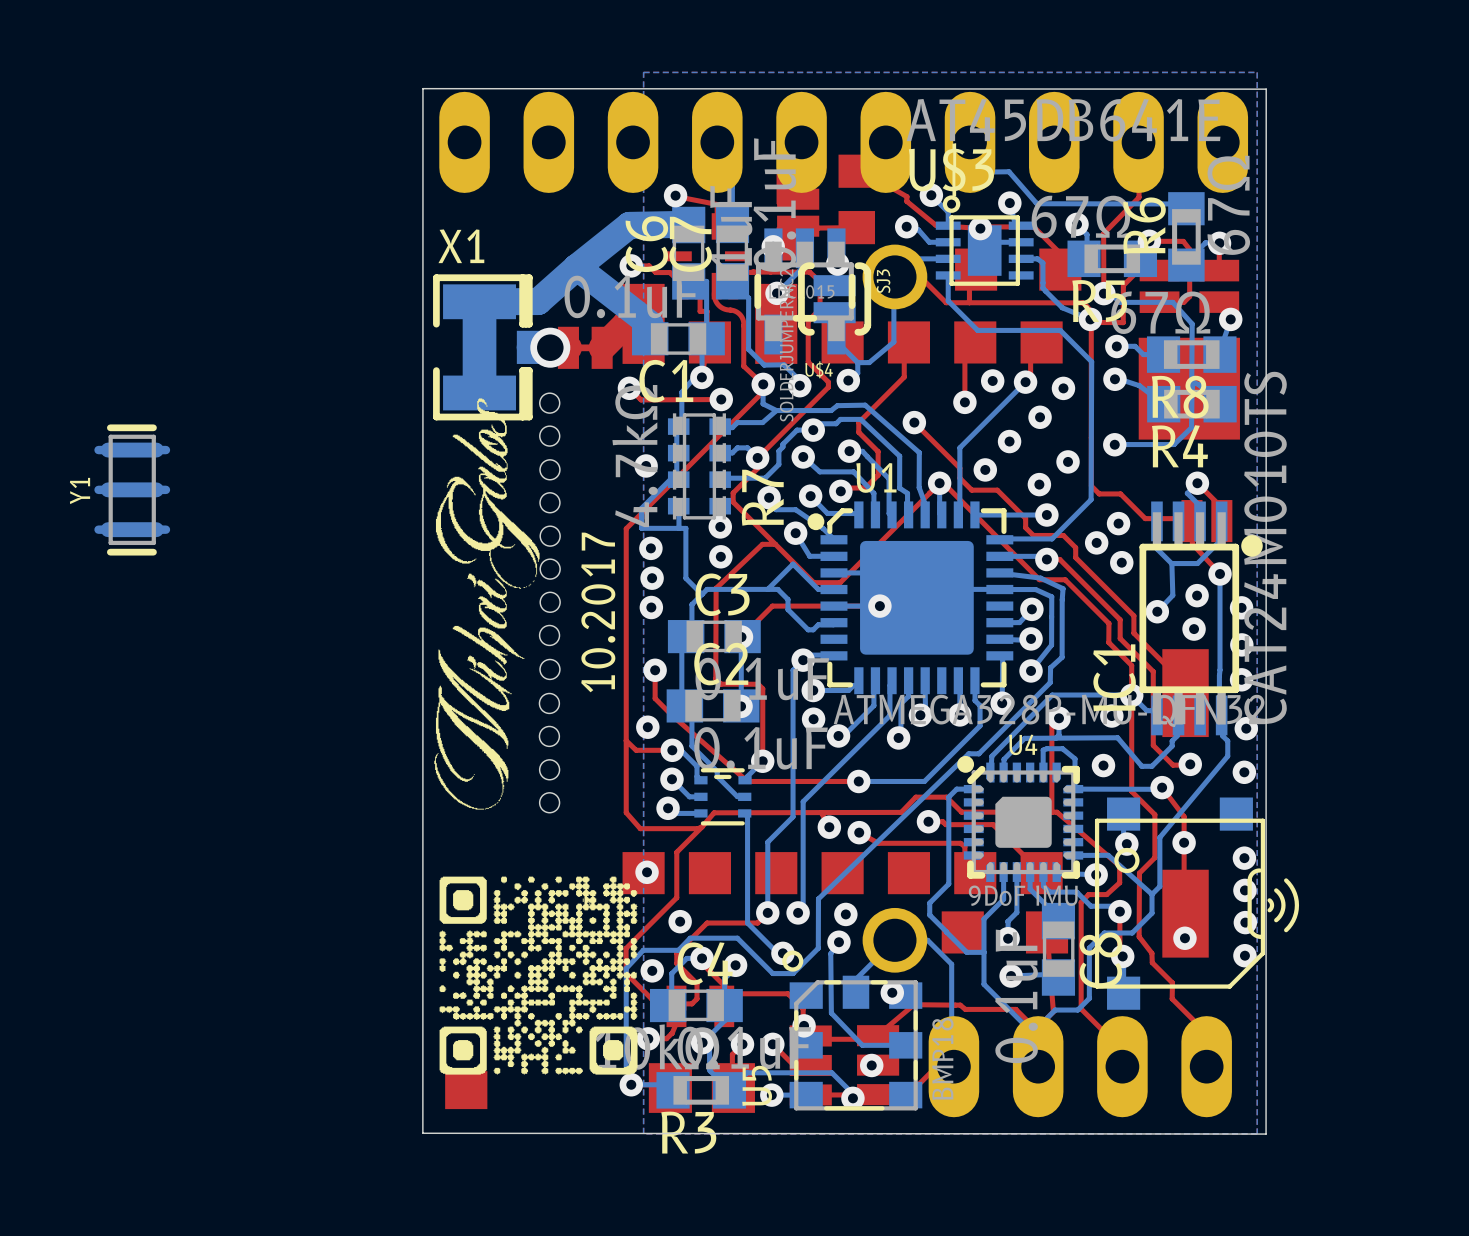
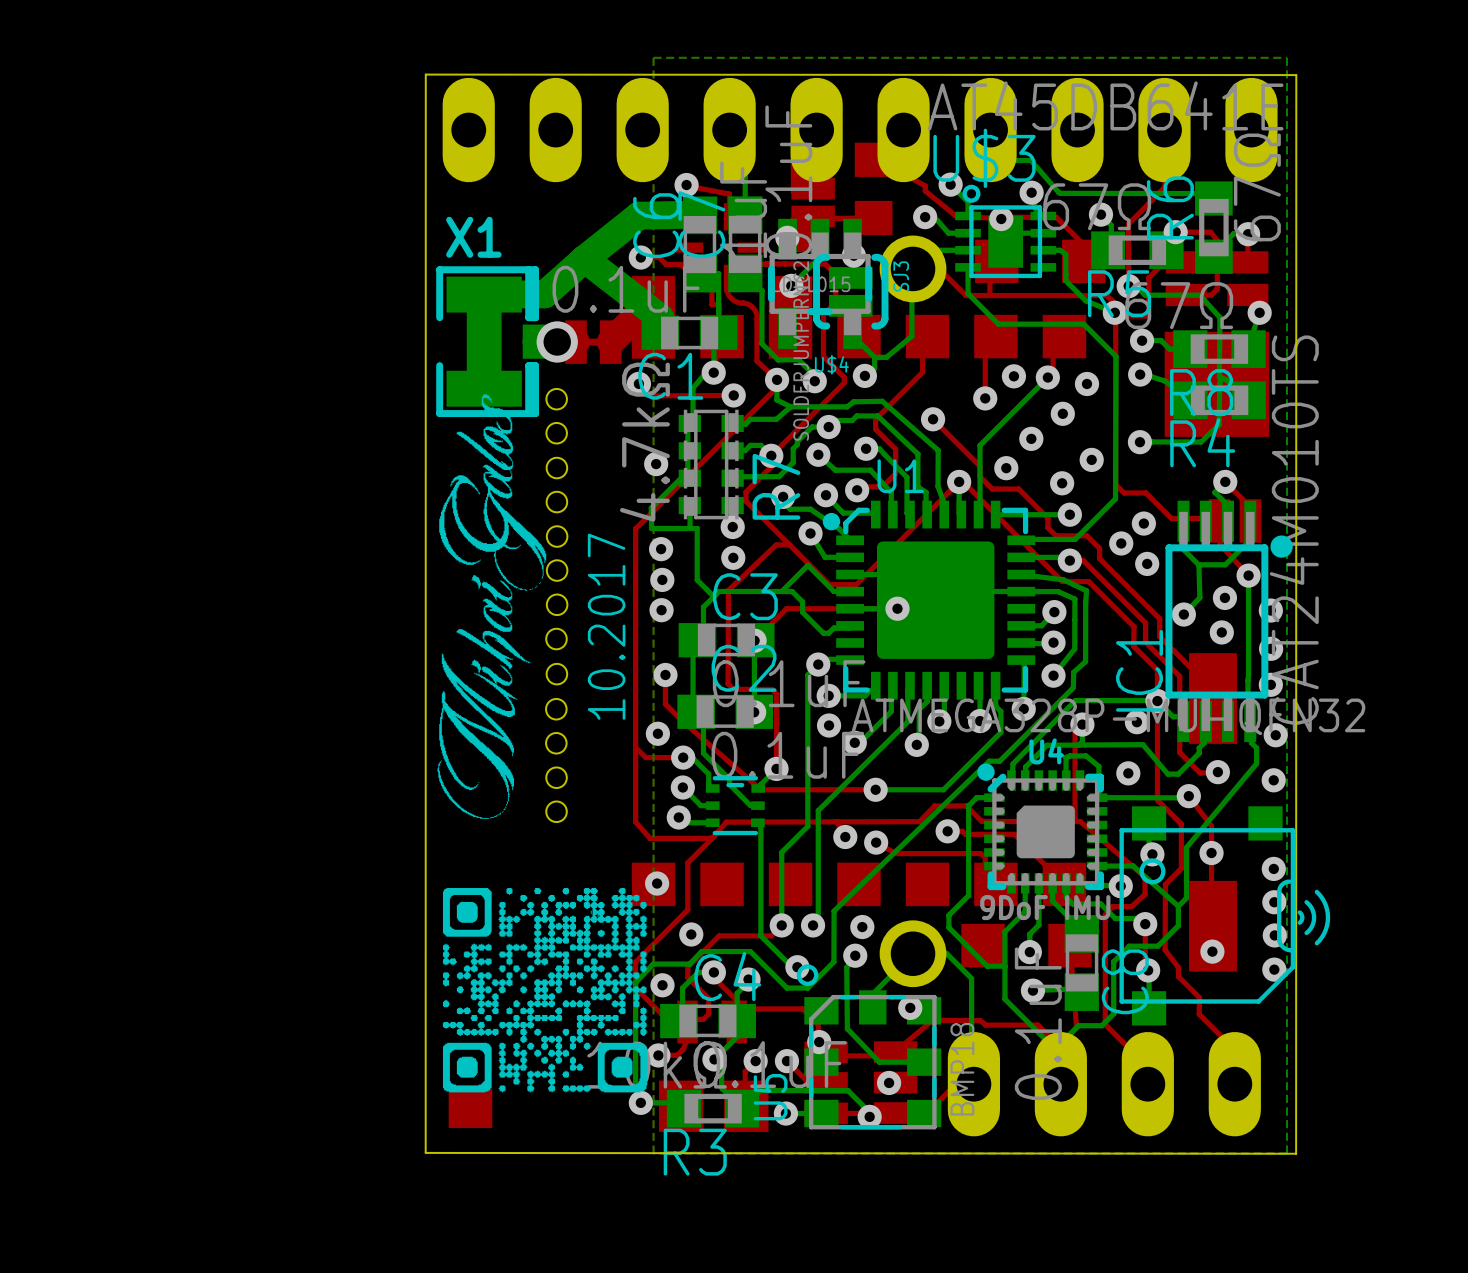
Y1: (132, 489) -> none

